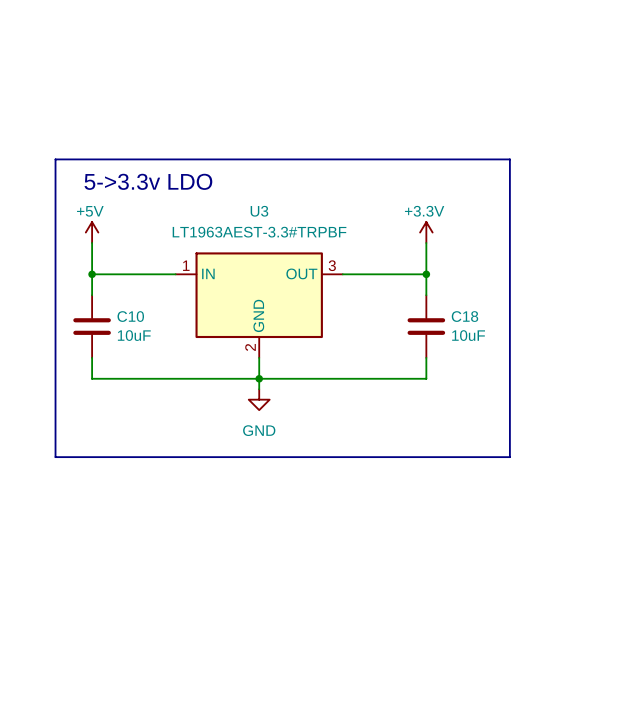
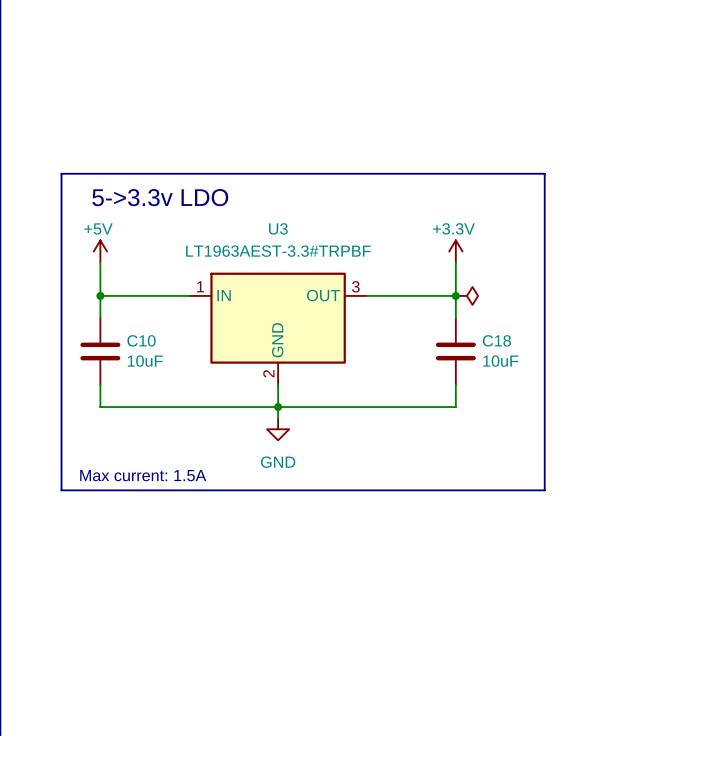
power symbol: none -> (466, 295)
text: none -> Max current: 1.5A (143, 475)

